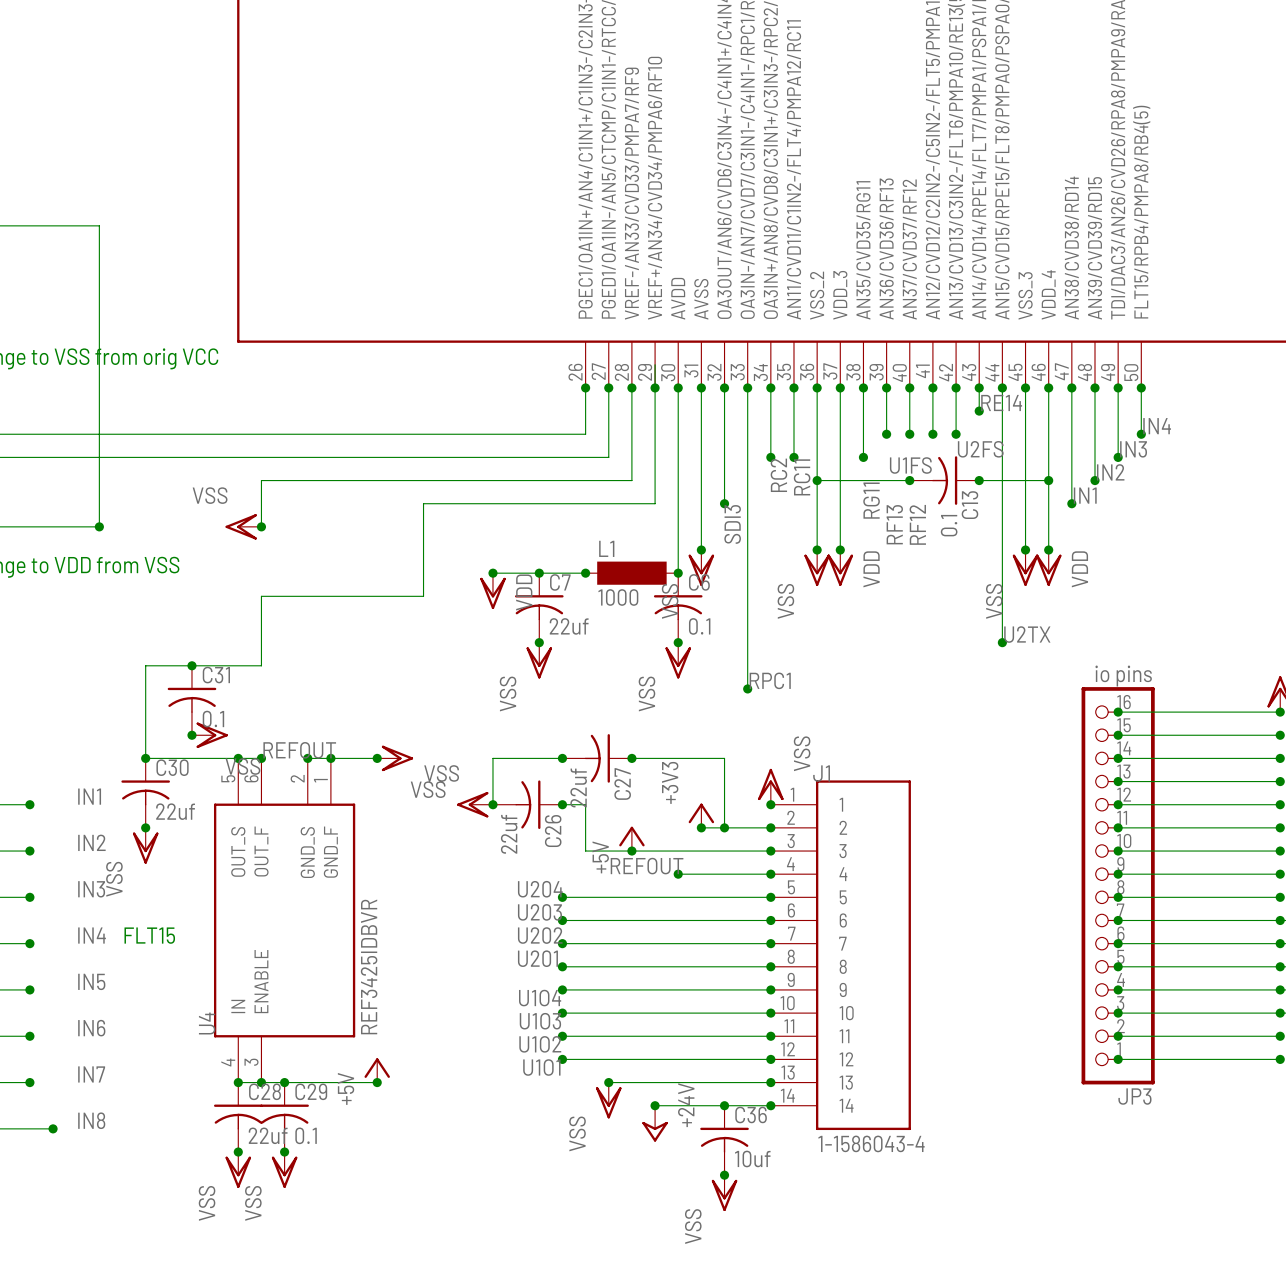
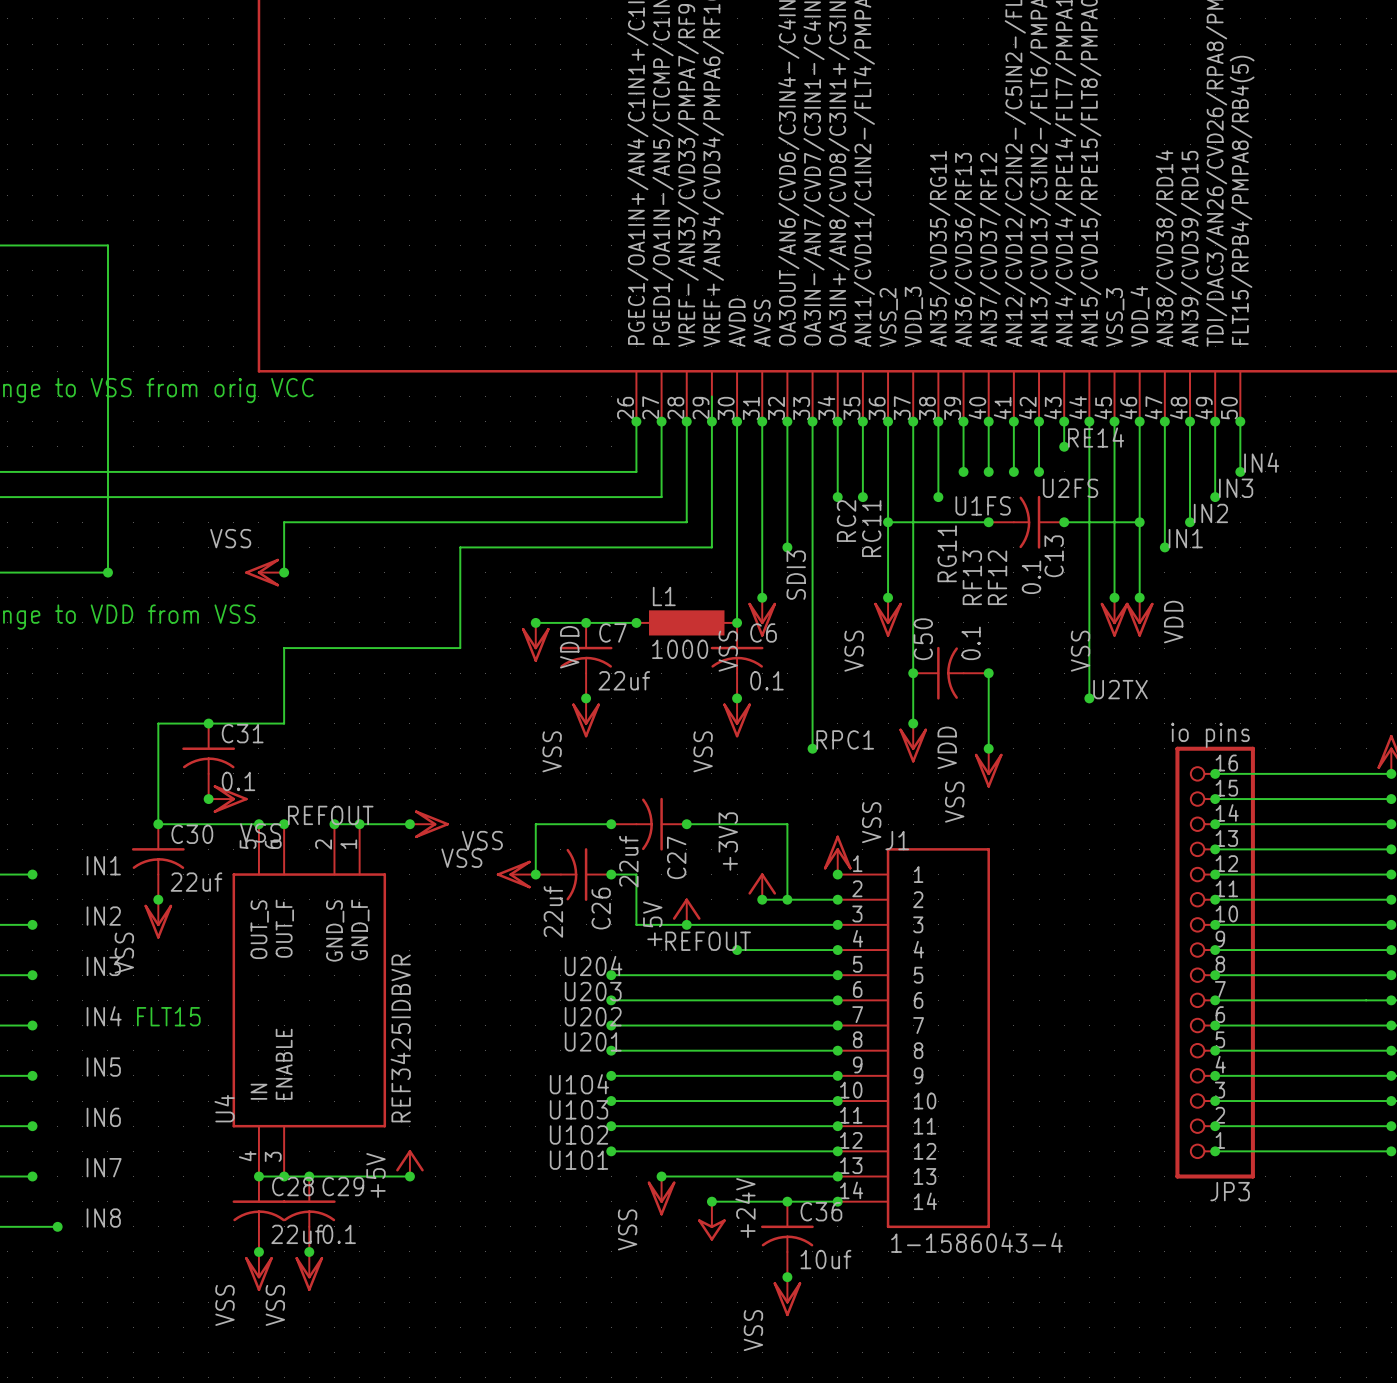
wire: none -> (913, 597) (913, 723)
junction: (840, 550) -> none
power symbol position: VDD (840, 567) -> VDD (913, 743)
junction: none -> (913, 673)
C50: none -> 0.1 (950, 673)
wire: none -> (988, 673) (988, 748)
junction: none -> (988, 673)
junction: none -> (913, 723)
junction: none -> (988, 748)
power symbol: none -> VSS (988, 768)

